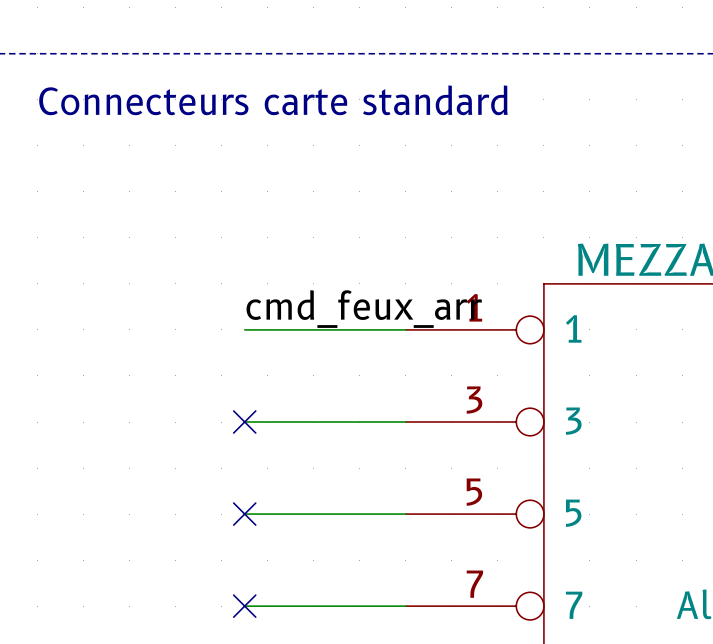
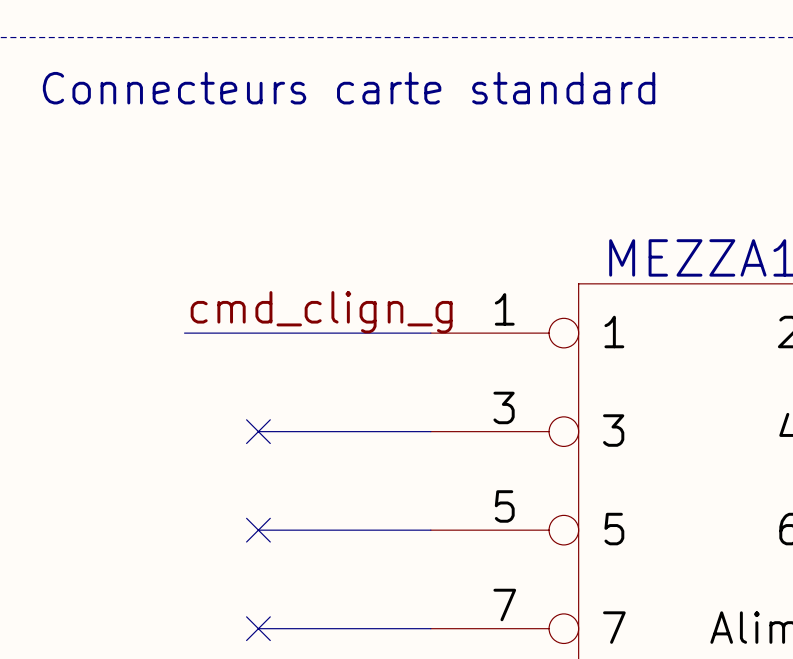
label: none -> cmd_clign_g (321, 312)
label: cmd_feux_arr (364, 309) -> none
wire: none -> (184, 333) (258, 333)

